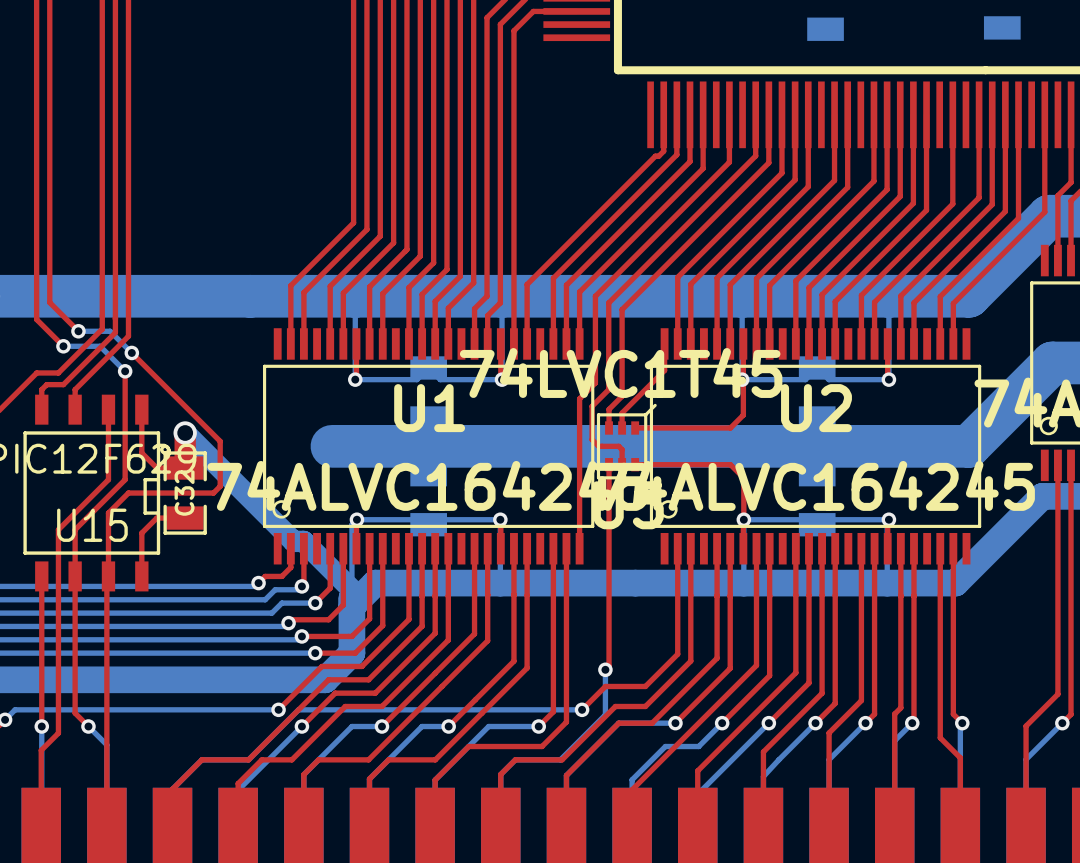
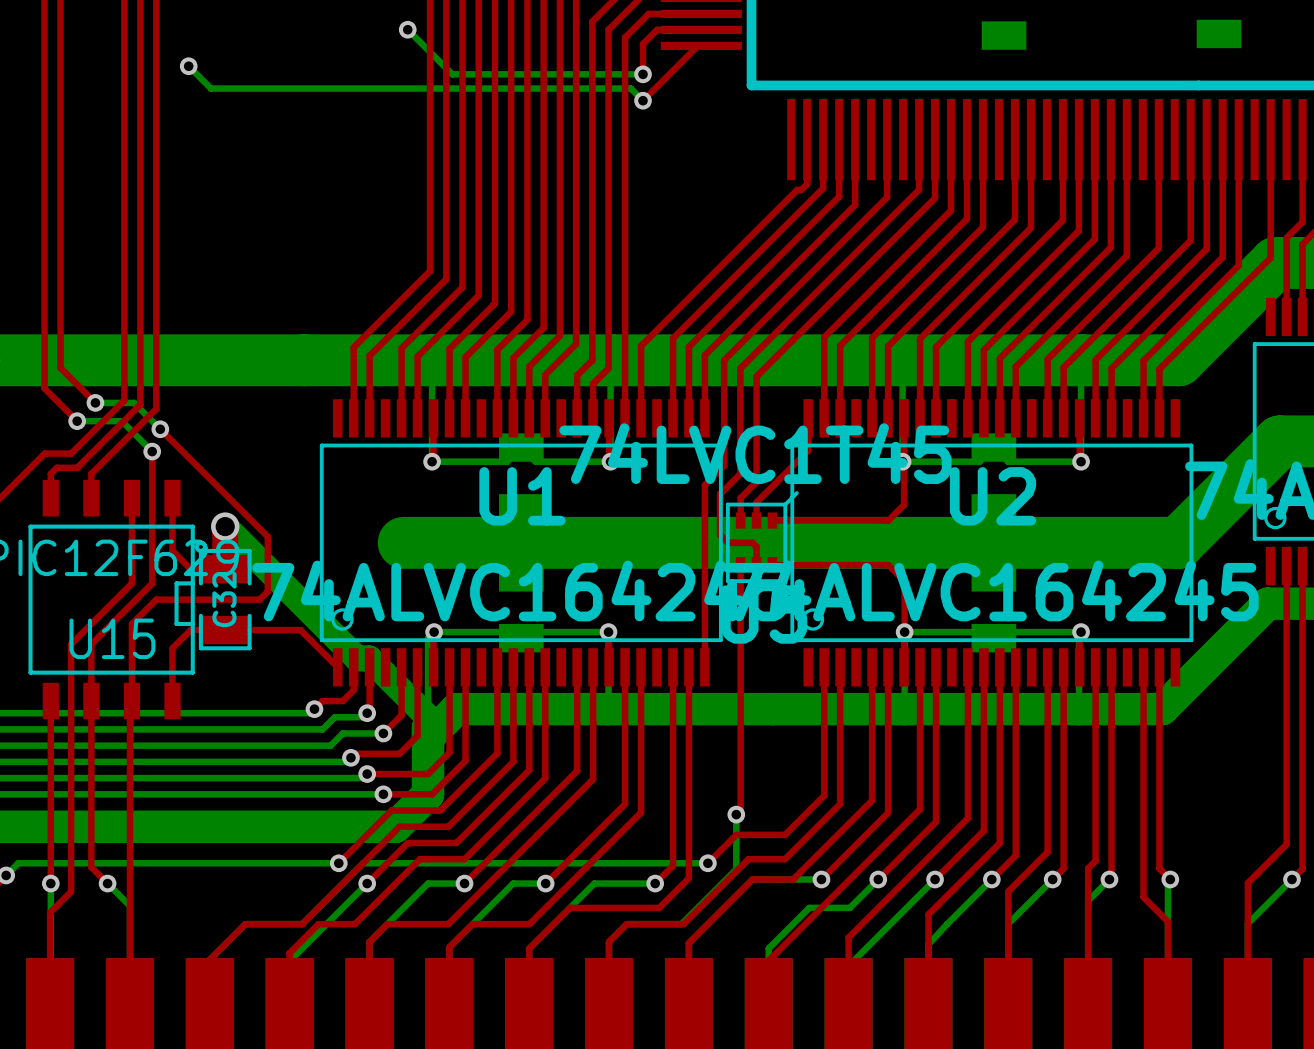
bottom track: none -> (407, 29) (452, 74) (643, 74)
via: none -> (407, 29)
top track: none -> (701, 29) (657, 29) (643, 43) (643, 74)
top track: none -> (701, 45) (697, 45) (643, 100)
bottom track: none -> (188, 66) (211, 88) (630, 88) (643, 100)
via: none -> (188, 66)
via: none -> (643, 74)
via: none -> (643, 100)
top track: none -> (225, 630) (300, 630) (337, 667)

